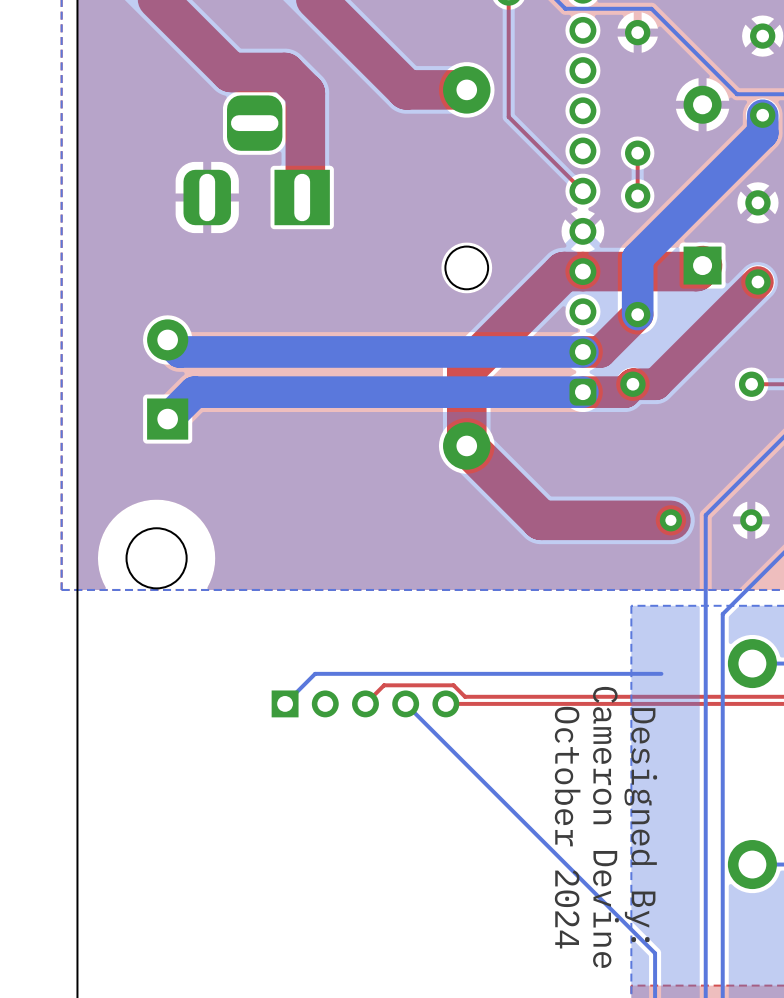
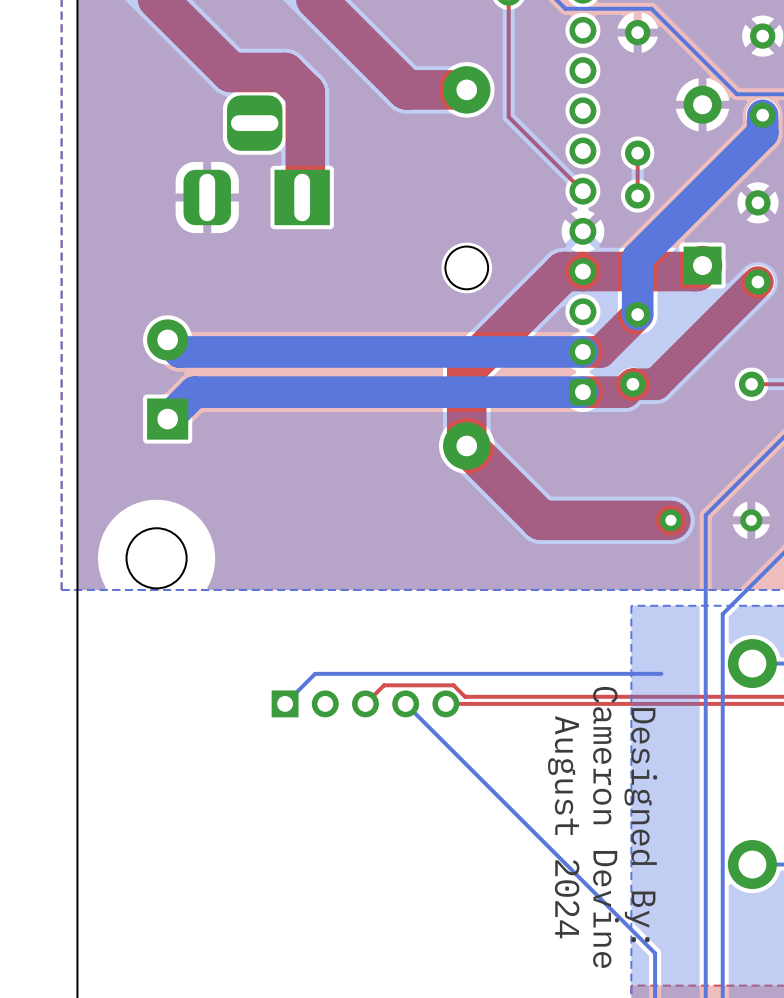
text: October 2024 (567, 827) -> August 2024 (563, 827)

